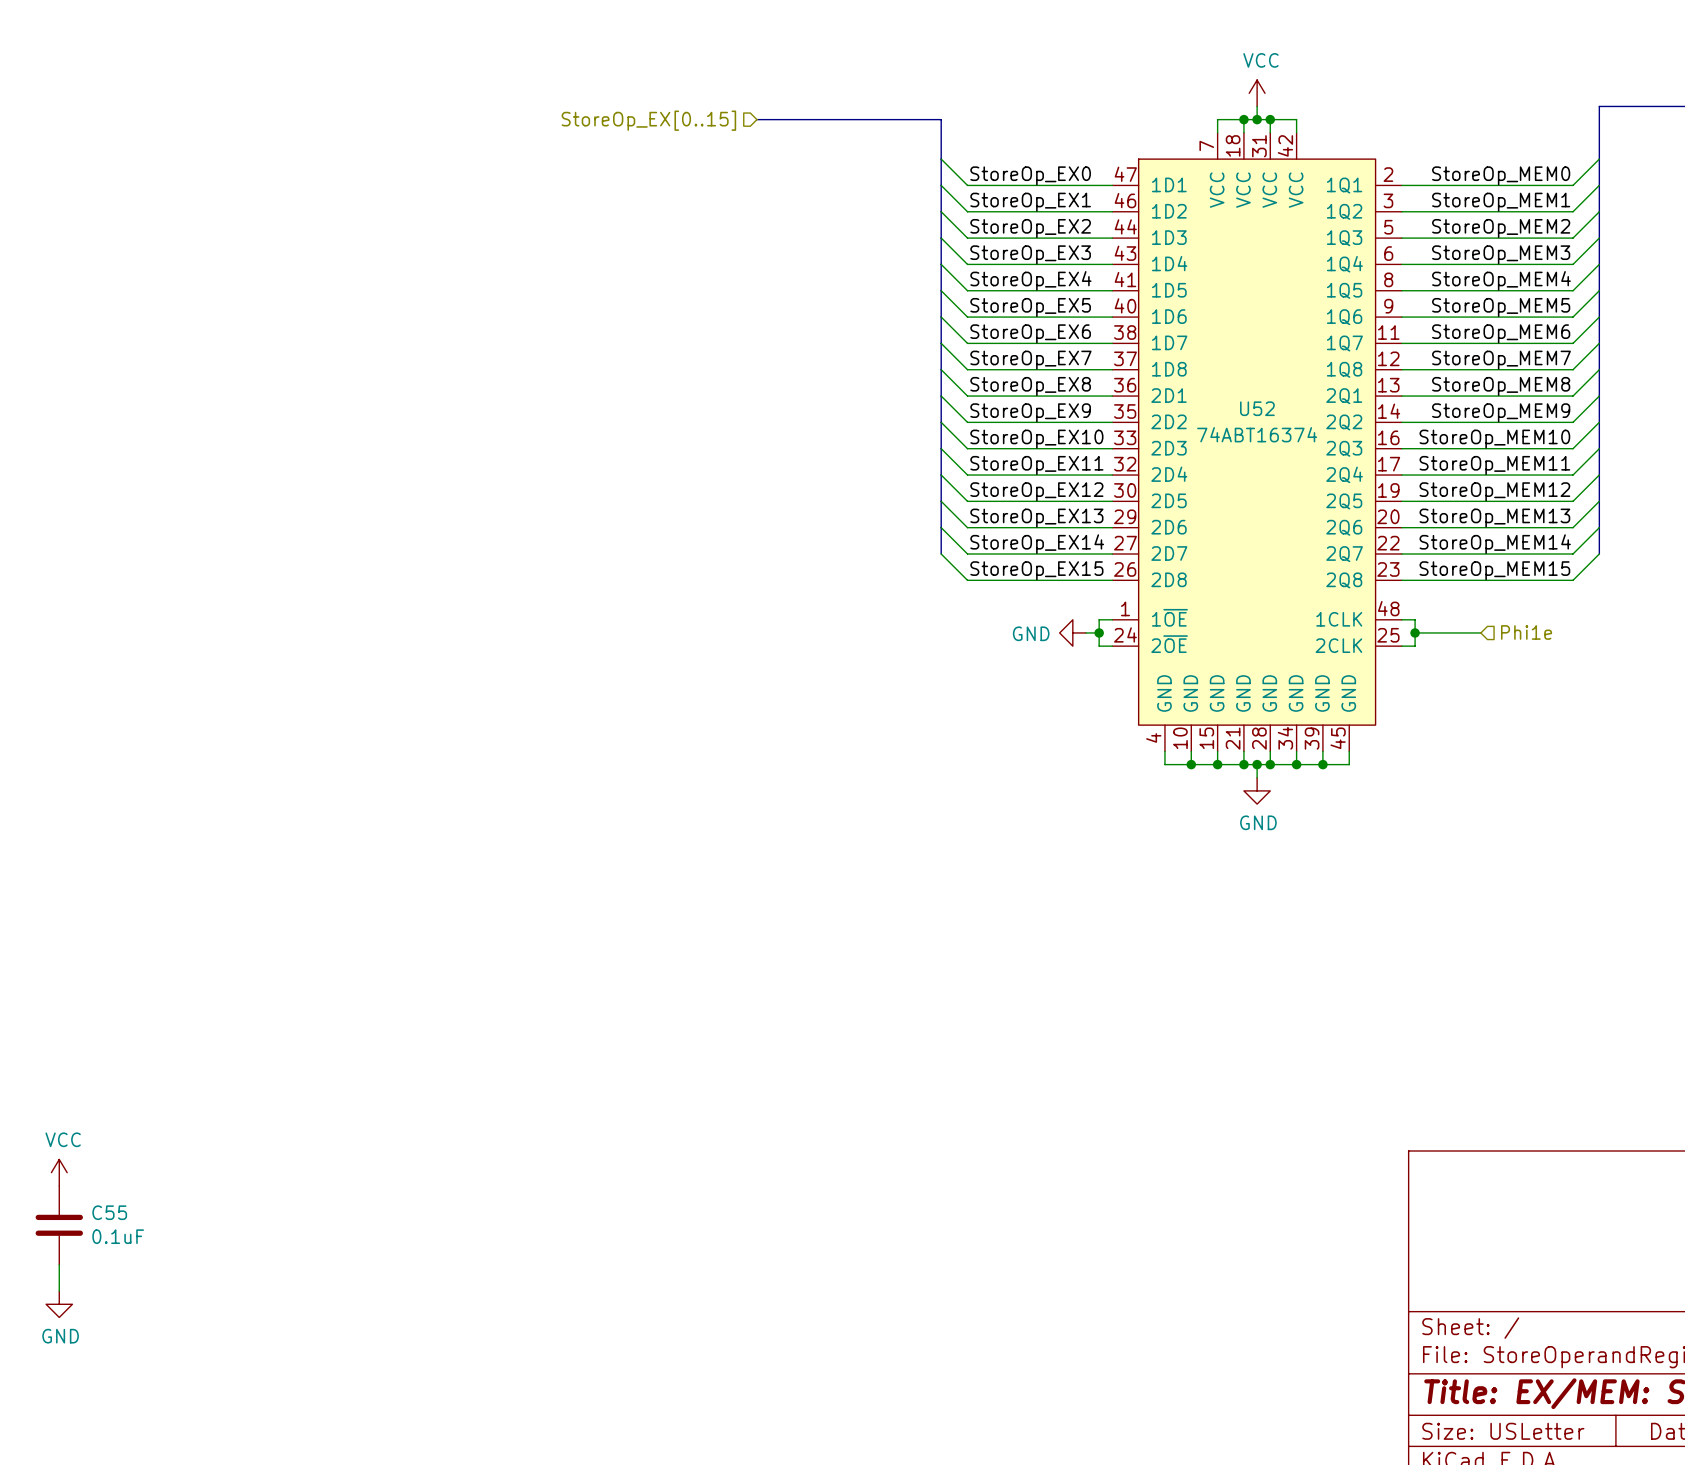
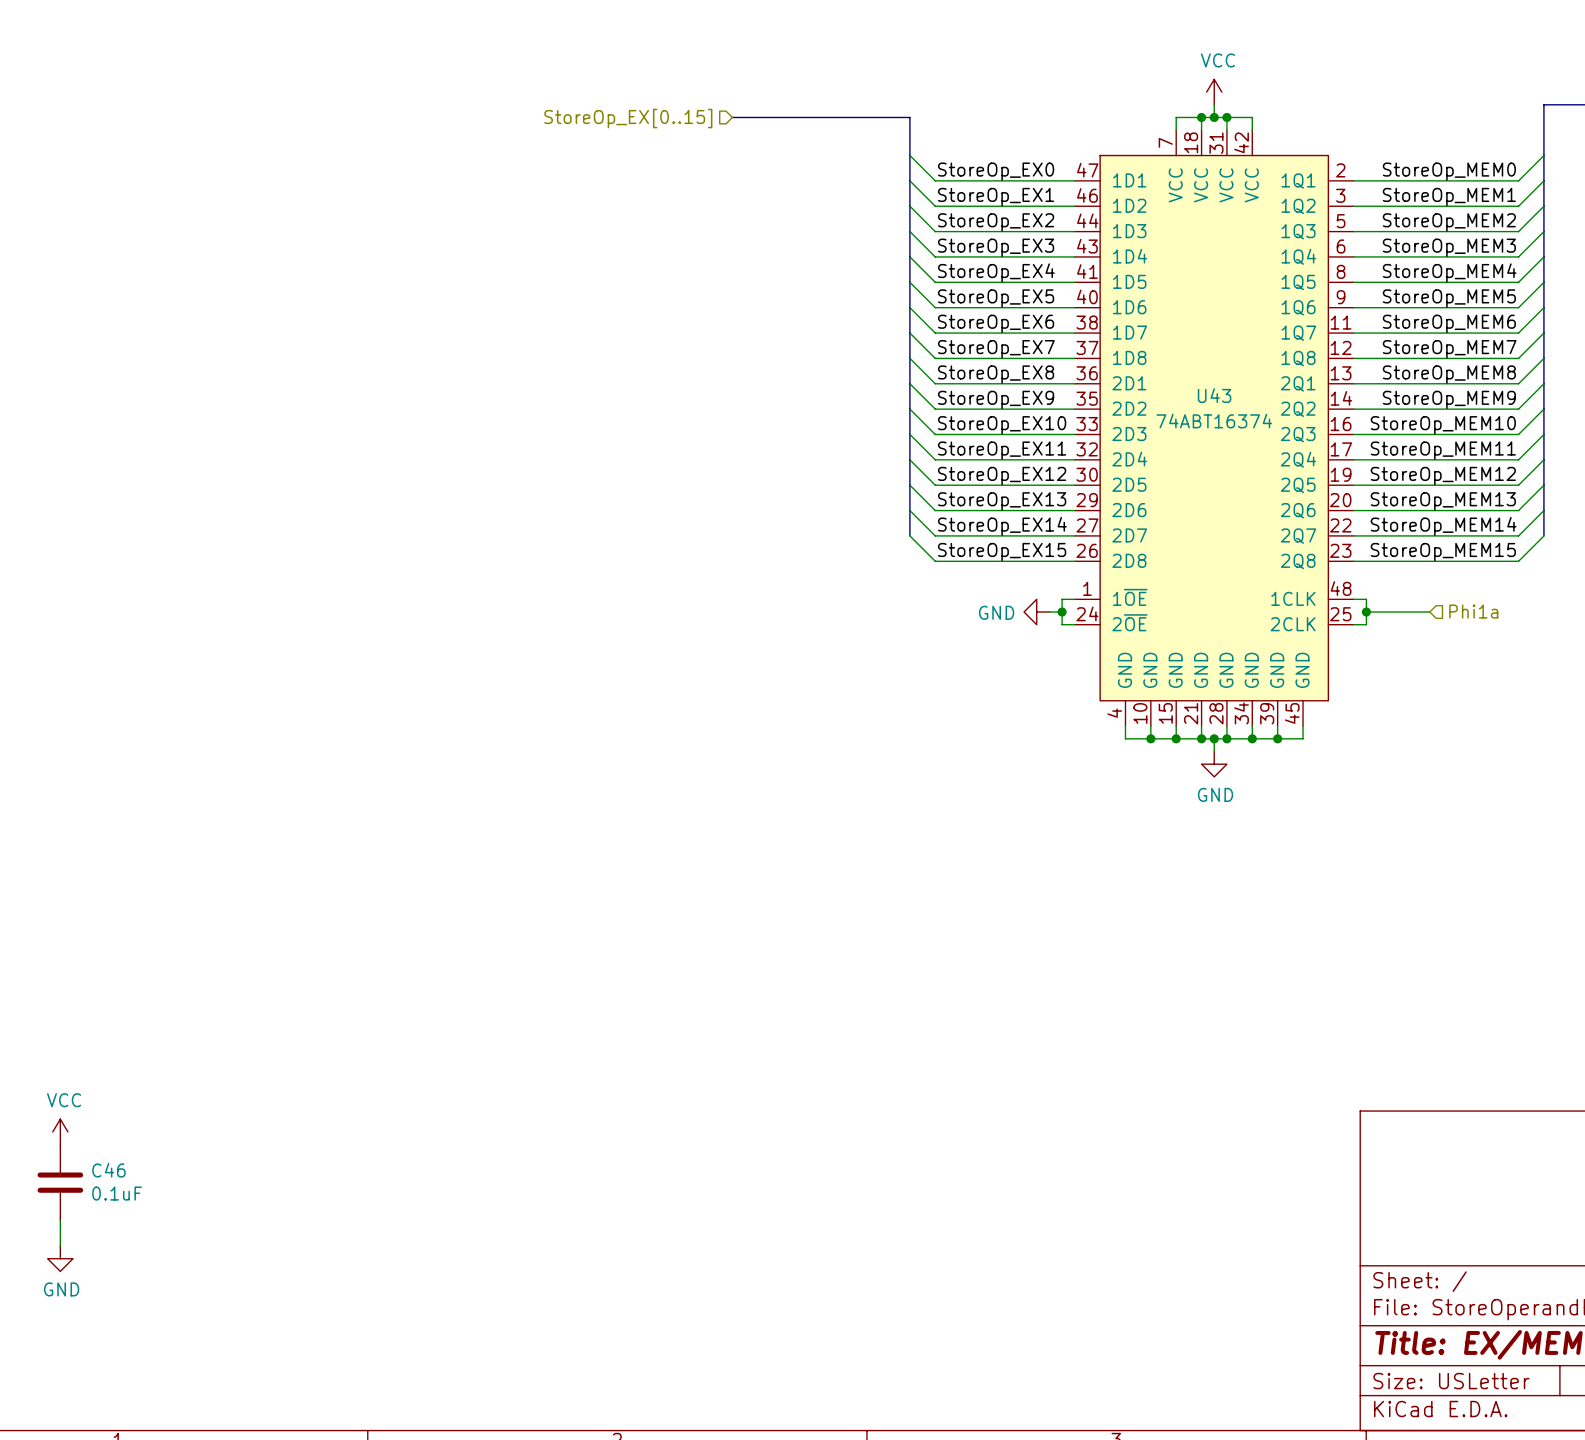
U52 name: U52 (1257, 408) -> U43 (1214, 395)
hierarchical label: Phi1e (1526, 632) -> Phi1a (1473, 611)
C55 name: C55 (109, 1212) -> C46 (108, 1170)

